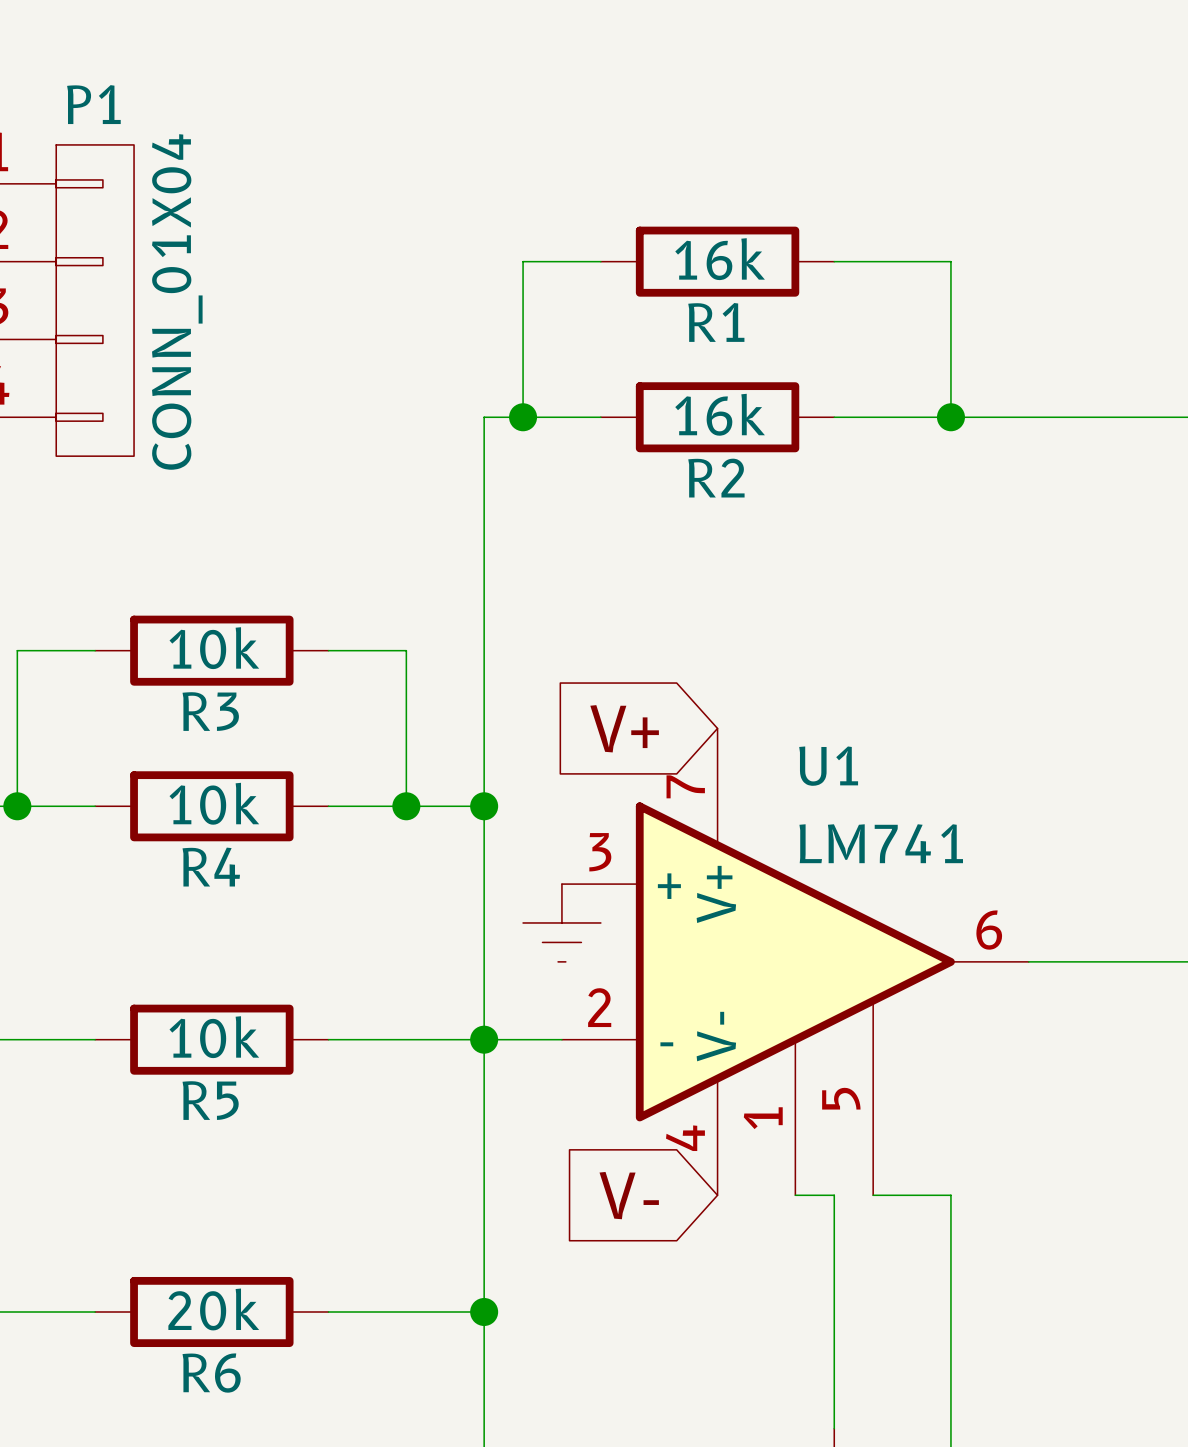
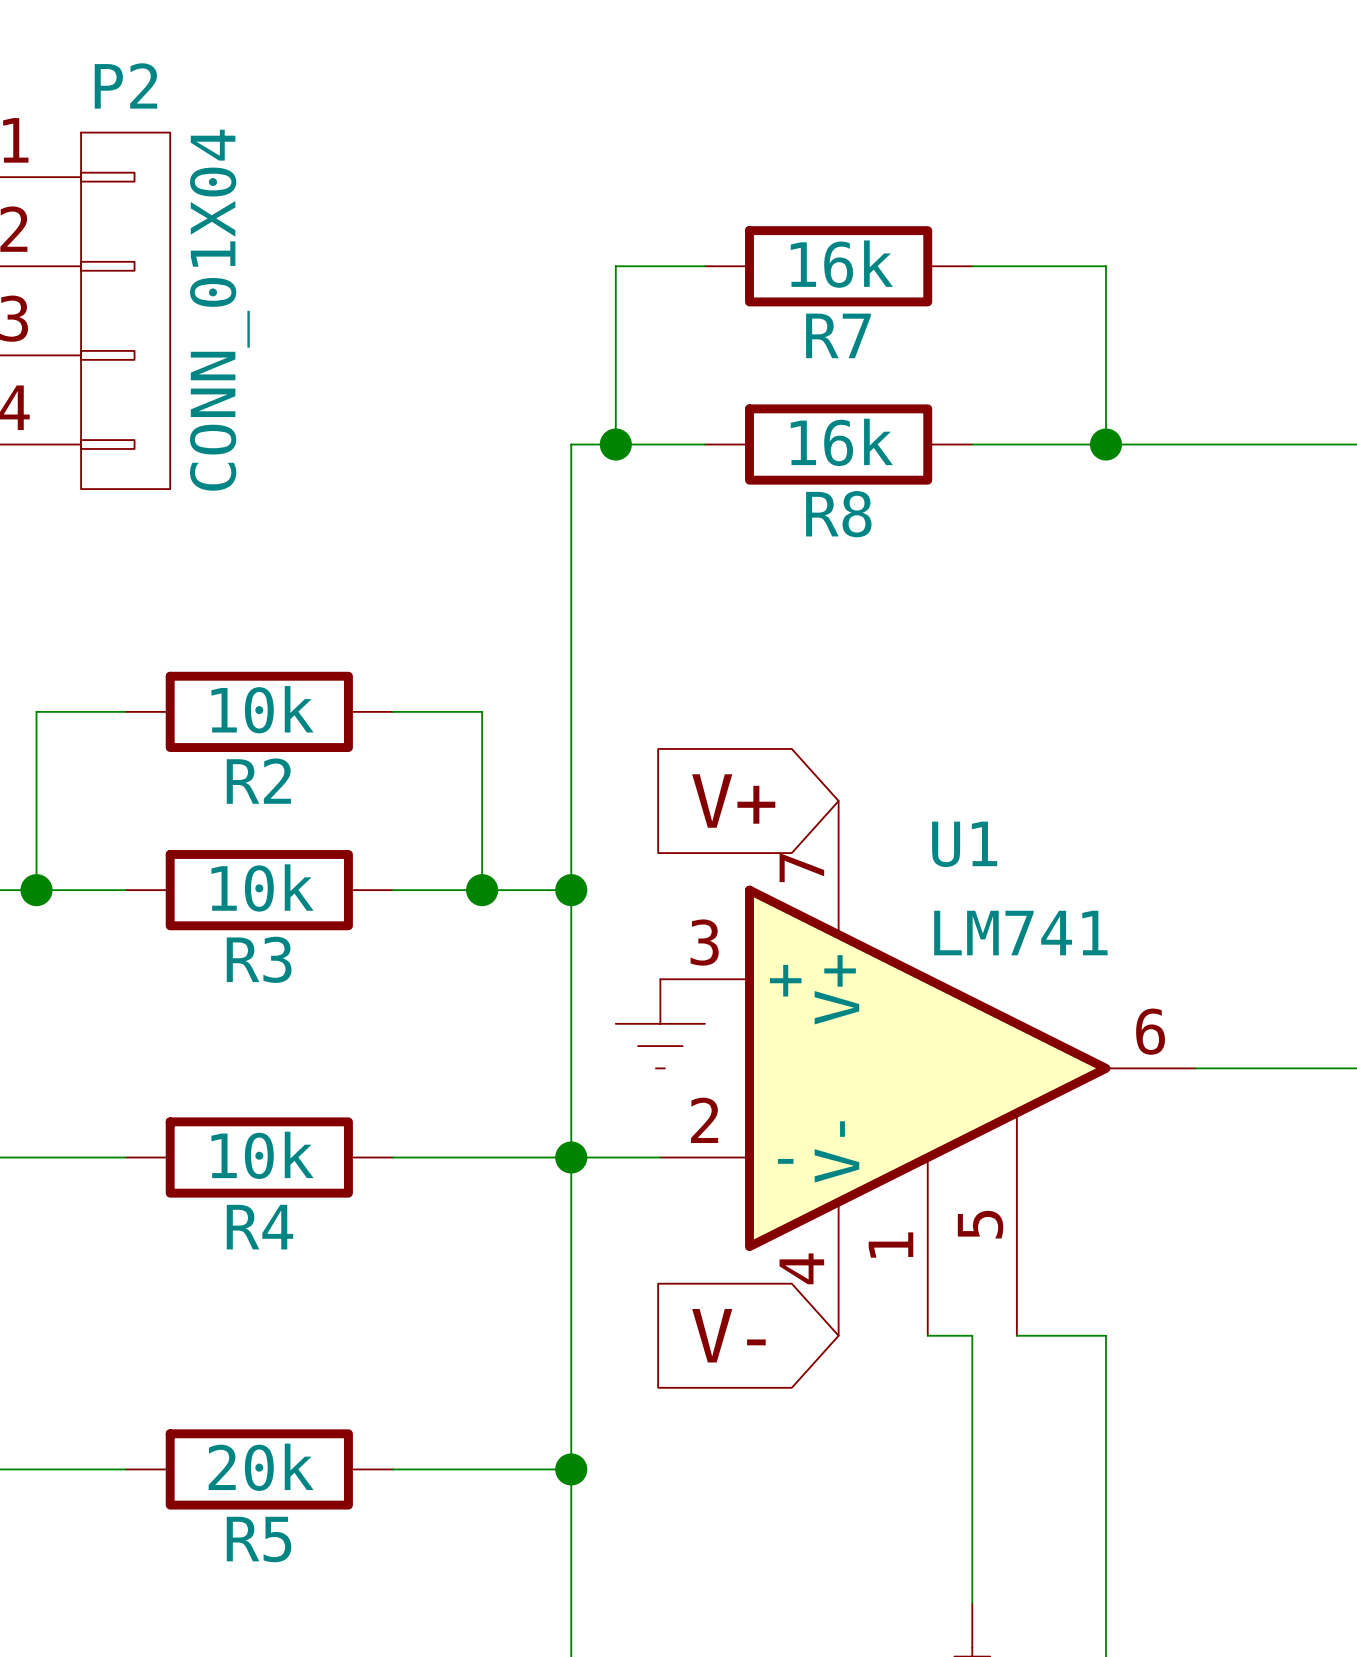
P1 name: P1 (93, 104) -> P2 (125, 85)
R1 name: R1 (716, 322) -> R7 (838, 335)
R2 name: R2 (716, 478) -> R8 (838, 514)
R3 name: R3 (210, 711) -> R2 (258, 781)
R4 name: R4 (211, 867) -> R3 (259, 959)
R5 name: R5 (210, 1100) -> R4 (259, 1227)
R6 name: R6 (211, 1373) -> R5 (259, 1539)

